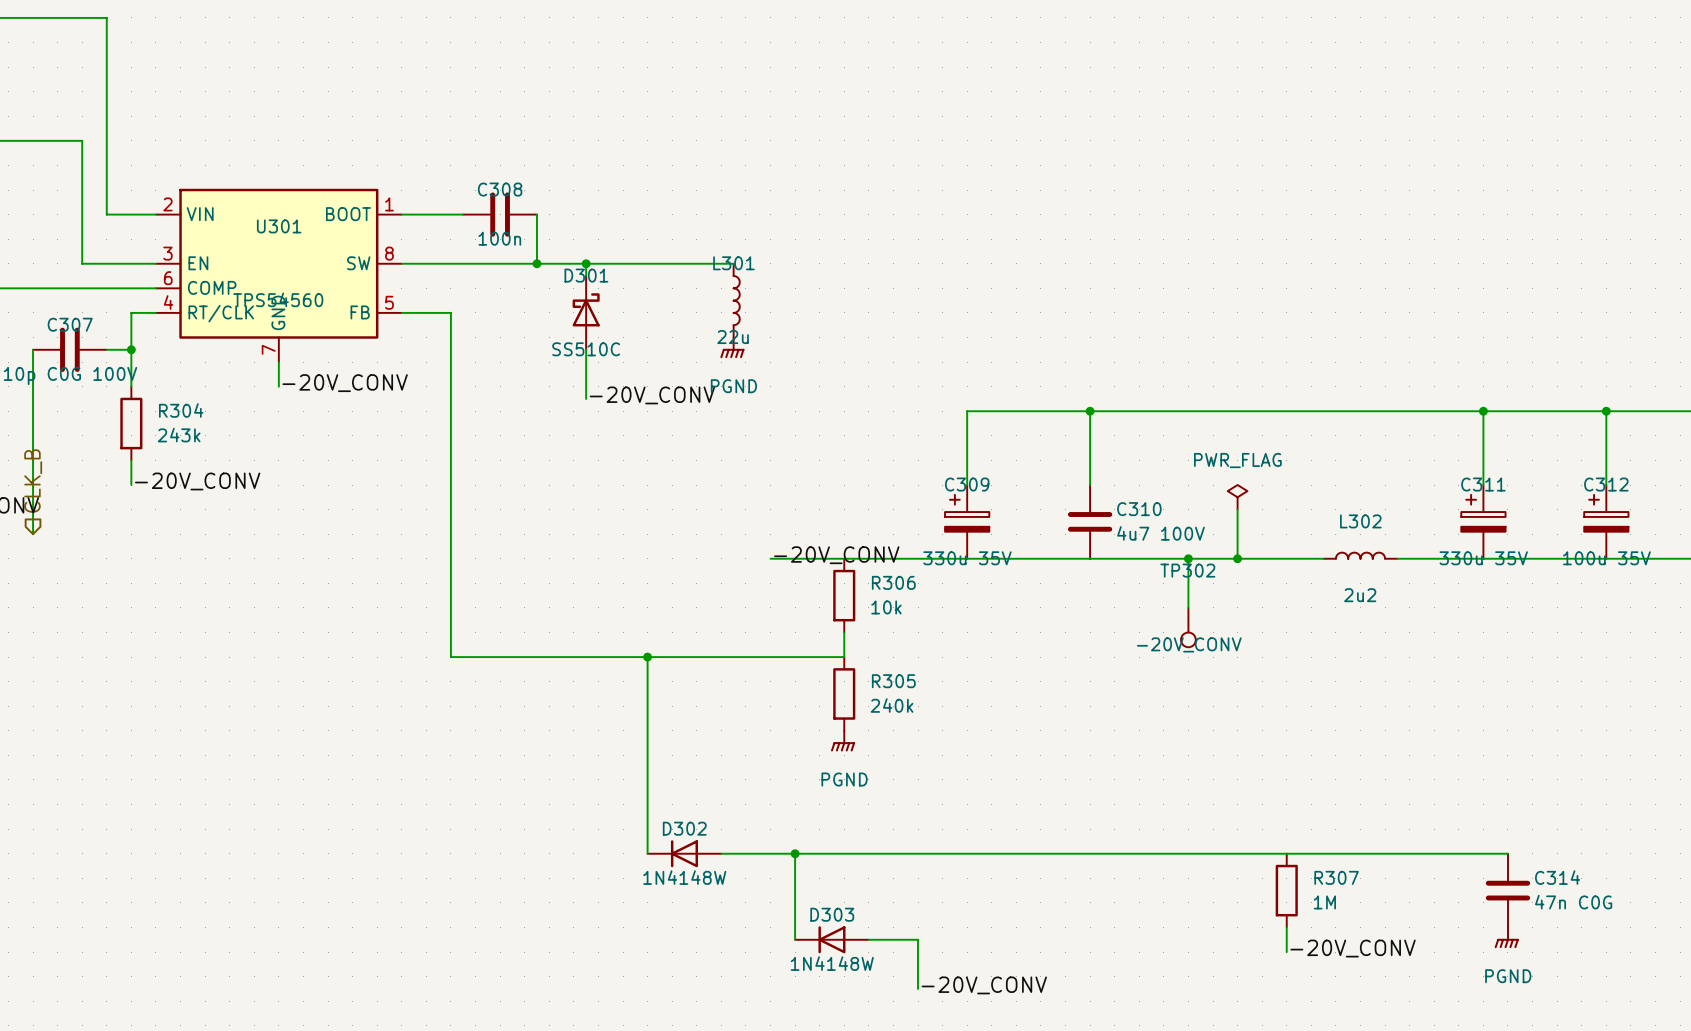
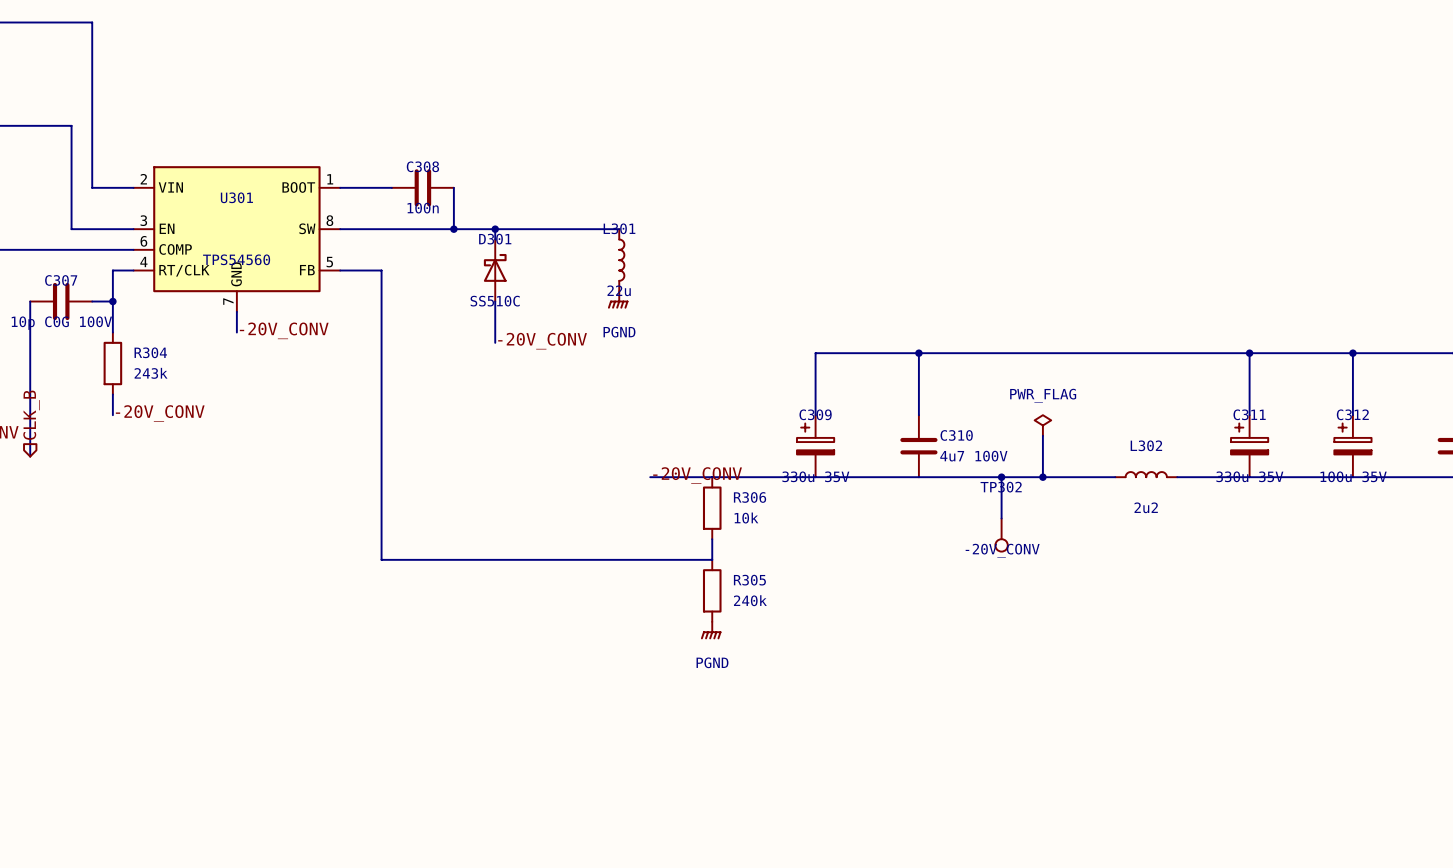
wire: (647, 657) (647, 853) -> none
junction: (647, 657) -> none
D302: 1N4148W (684, 853) -> none
wire: (721, 853) (1507, 853) -> none
wire: (795, 853) (795, 939) -> none
junction: (795, 853) -> none
R307: 1M (1286, 890) -> none
C314: 47n C0G (1507, 890) -> none
wire: (1286, 927) (1286, 952) -> none
power symbol: PGND (1506, 937) -> none
D303: 1N4148W (831, 939) -> none
wire: (868, 939) (918, 939) (918, 988) -> none
label: -20V_CONV (1353, 948) -> none
label: -20V_CONV (984, 985) -> none

